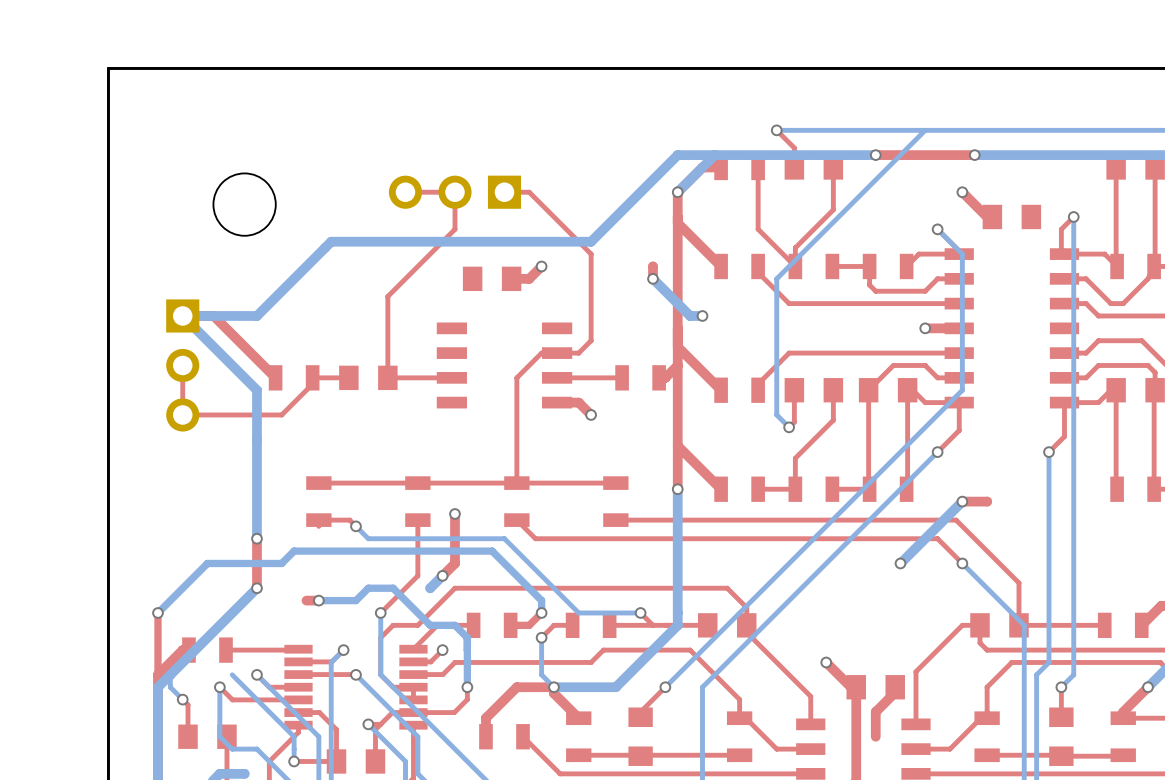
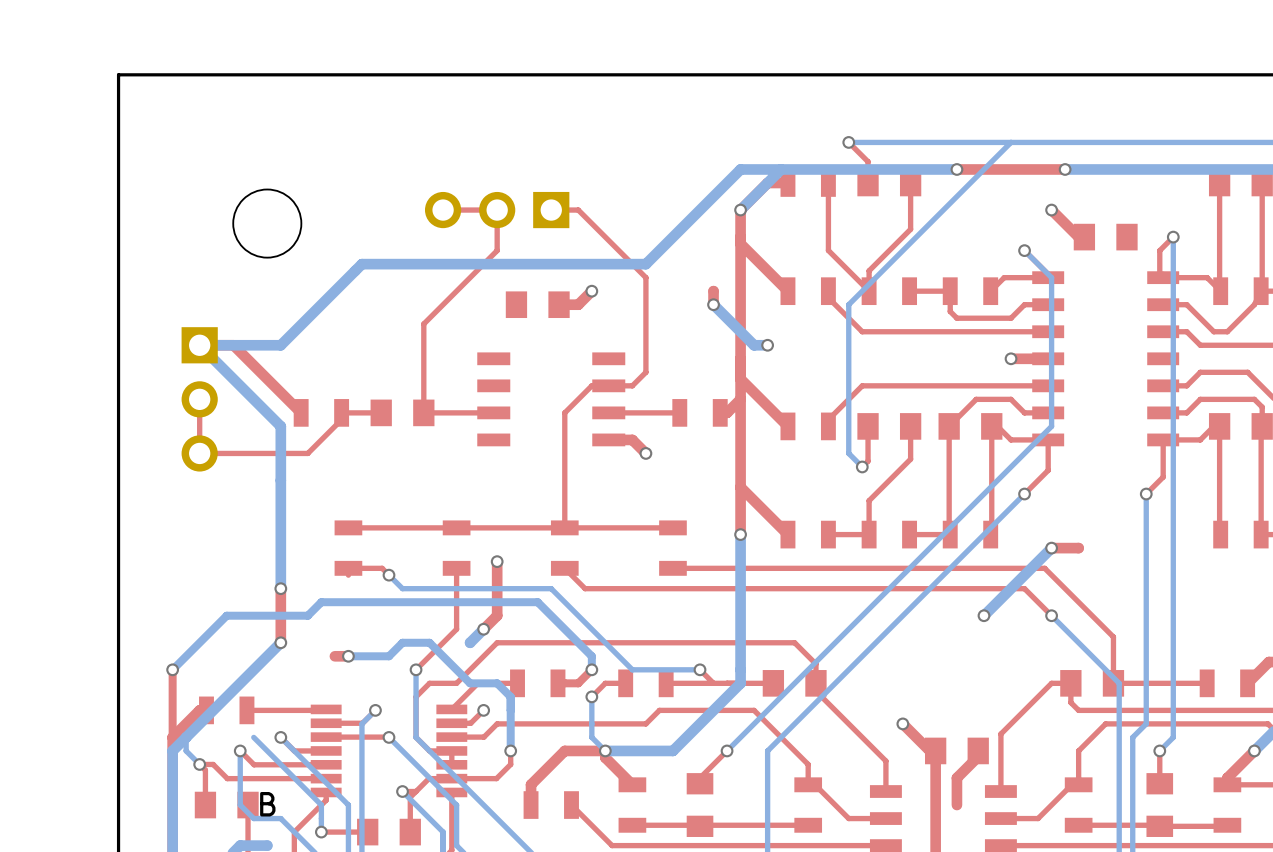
top track: (298, 712) (319, 712) (336, 729) (336, 761) -> (326, 778) (227, 778) (213, 764) (199, 764)
B name: none -> B (267, 804)

